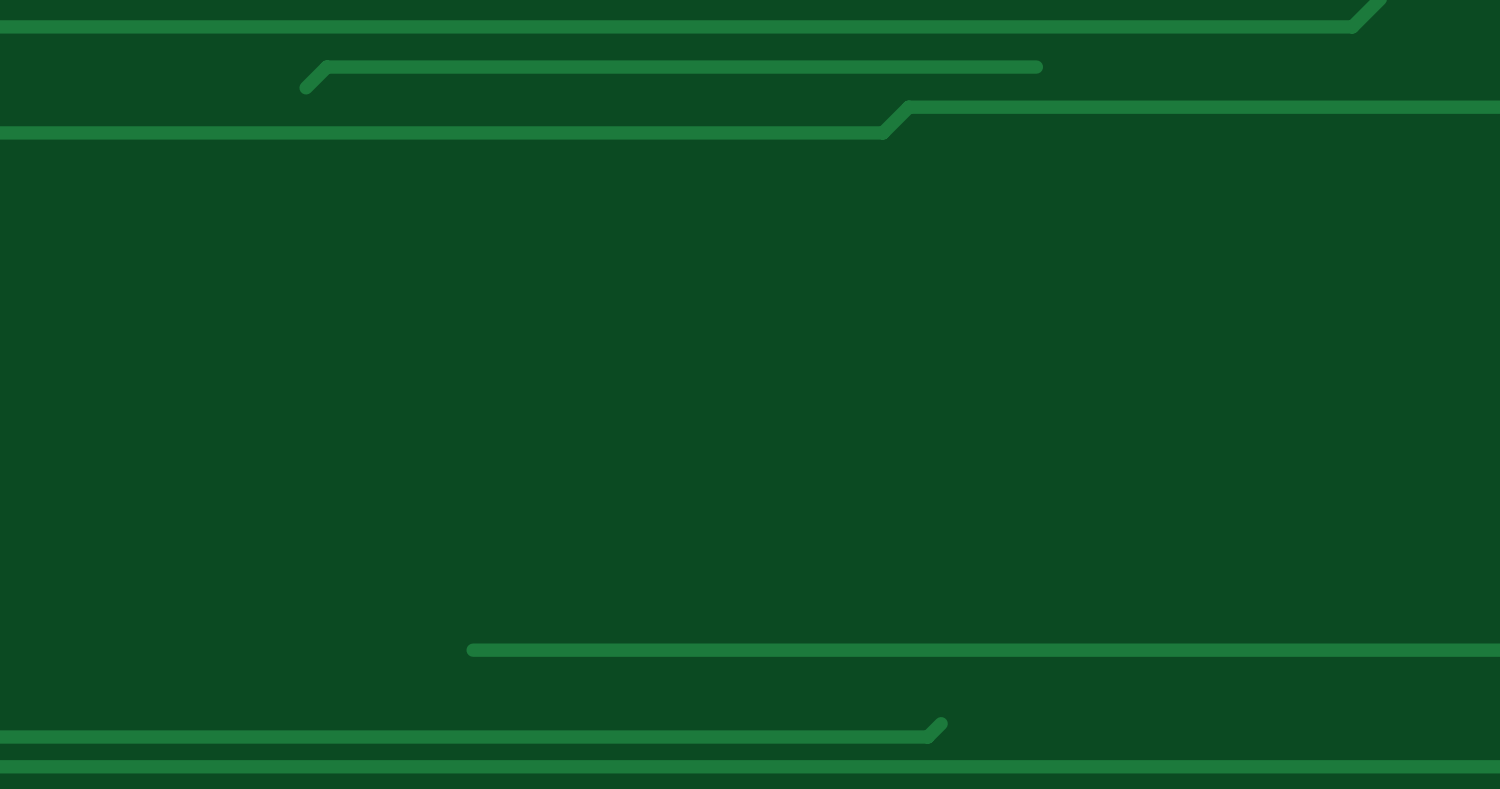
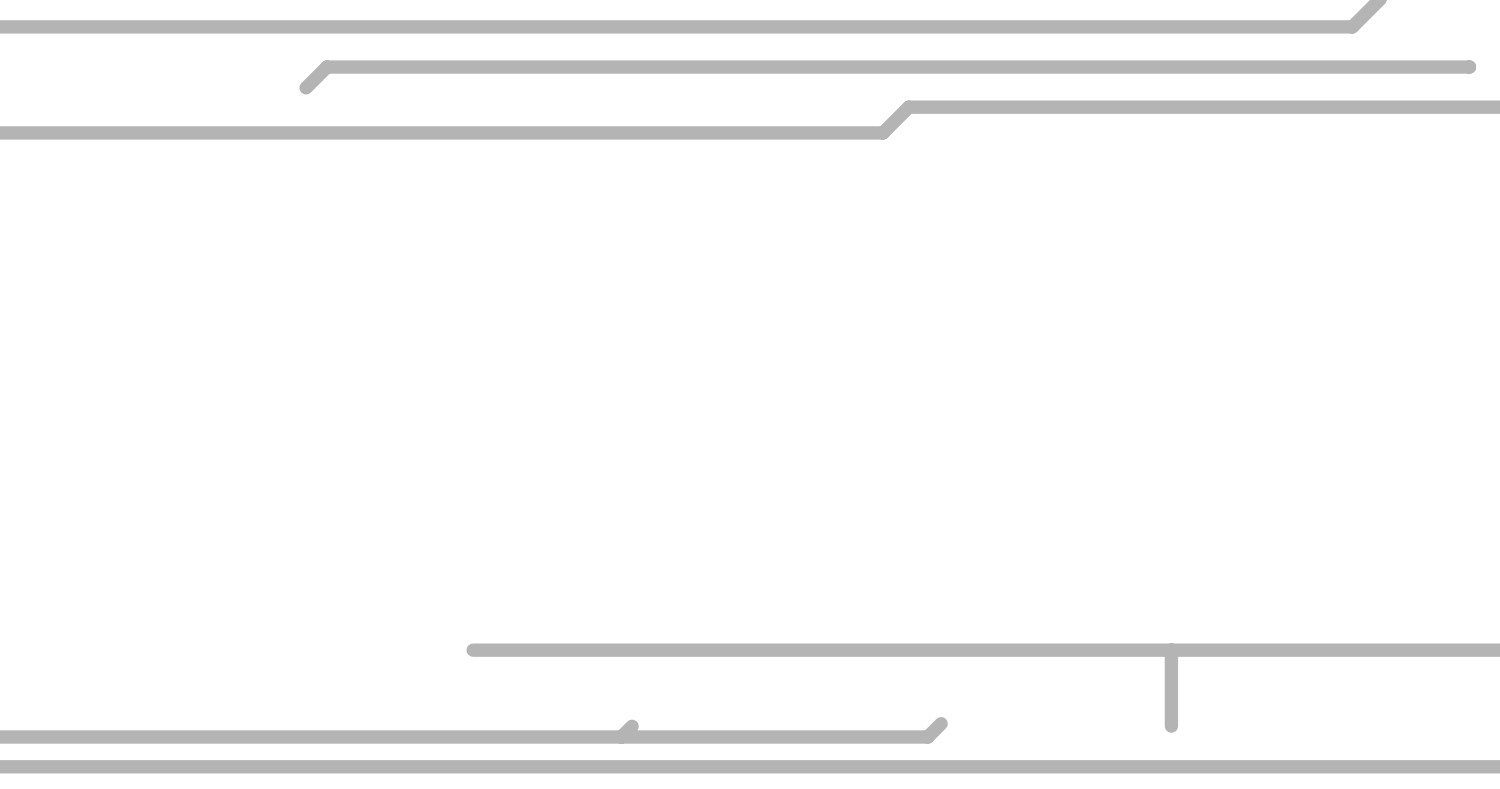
track: none -> (1469, 67) (1036, 67)
track: none -> (1171, 650) (1171, 726)
track: none -> (632, 726) (621, 737)

